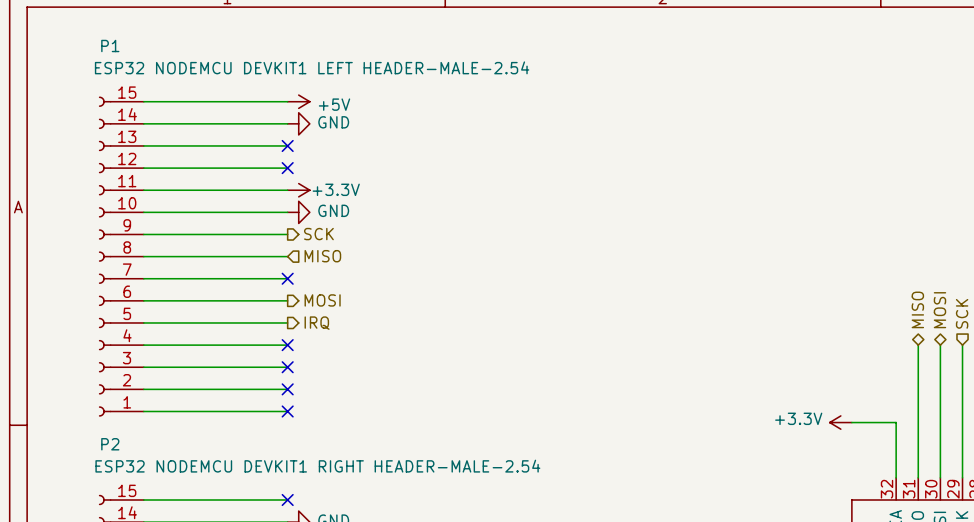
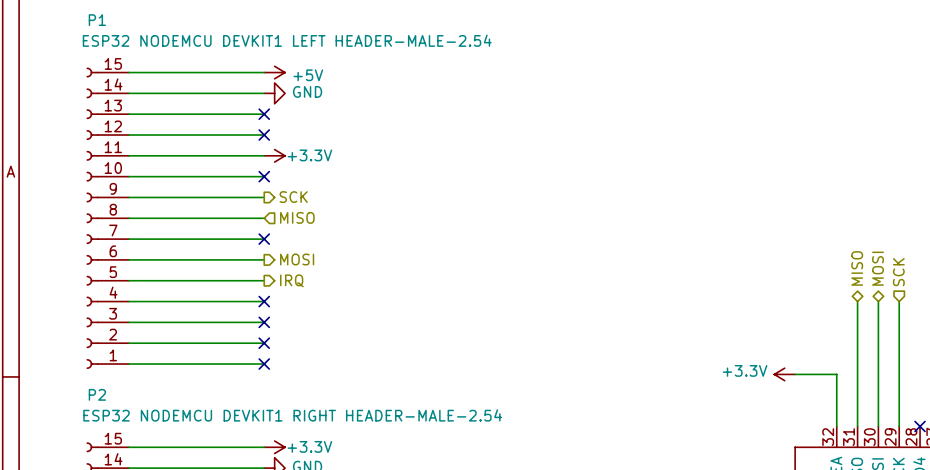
no-connect mark: none -> (264, 176)
power symbol: GND (298, 212) -> none
no-connect mark: (287, 499) -> none
power symbol: none -> +3.3V (274, 447)

